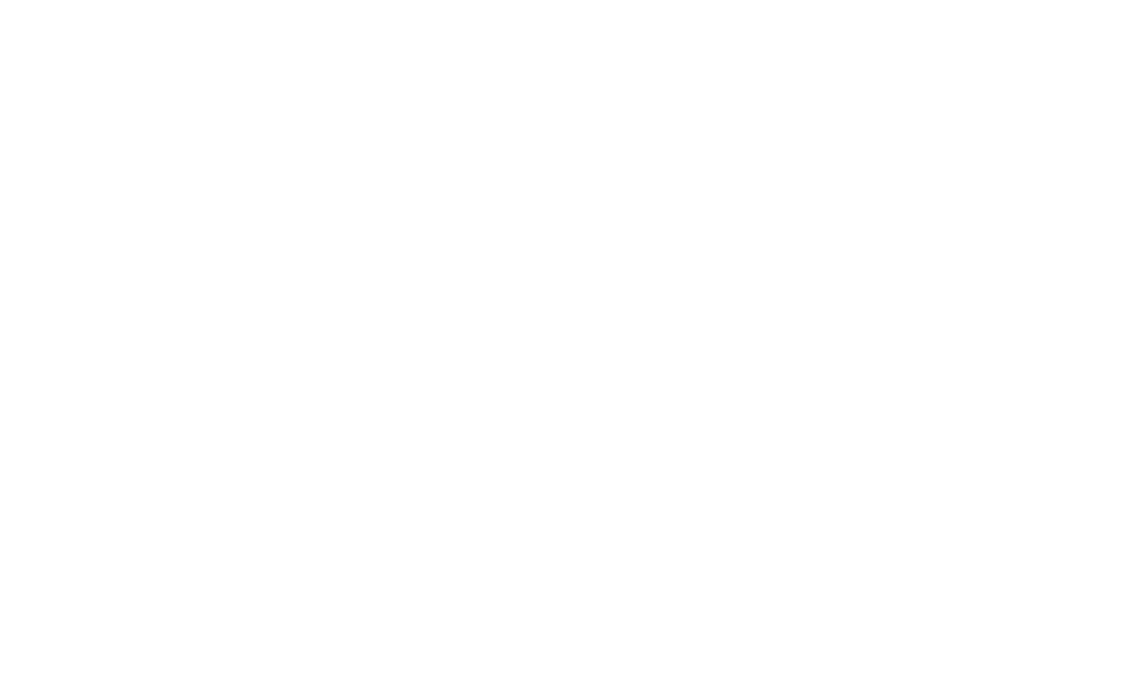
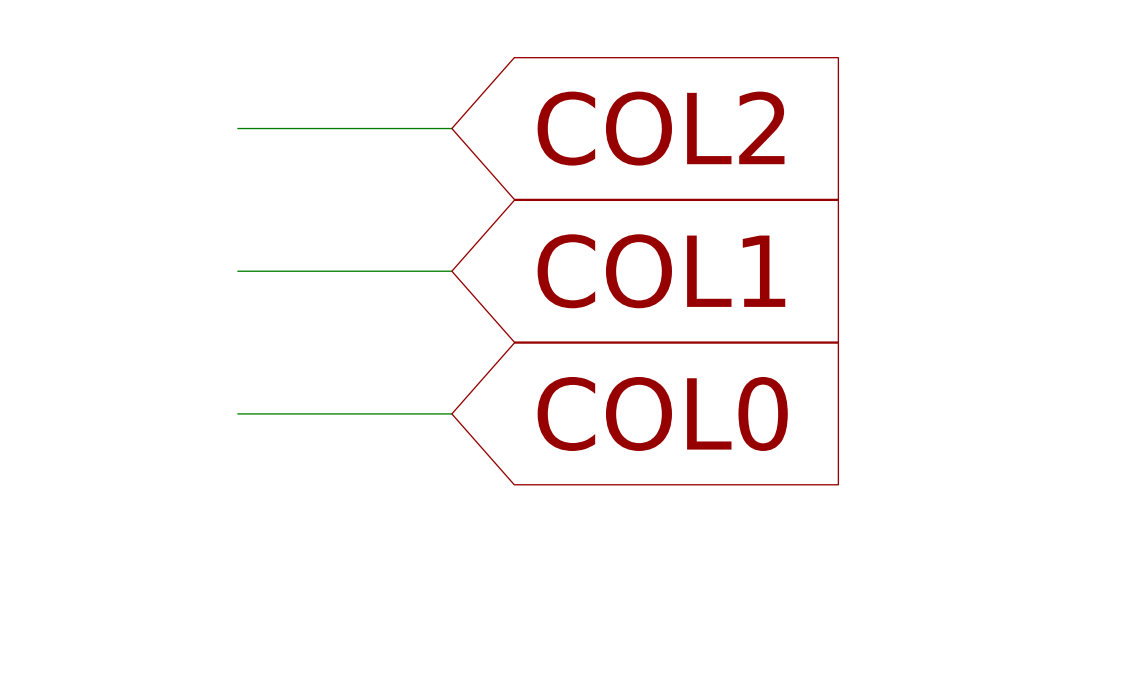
wire: none -> (237, 128) (451, 128)
global label: none -> COL2 (661, 128)
wire: none -> (237, 271) (451, 271)
global label: none -> COL1 (661, 271)
wire: none -> (237, 413) (451, 413)
global label: none -> COL0 (662, 413)

